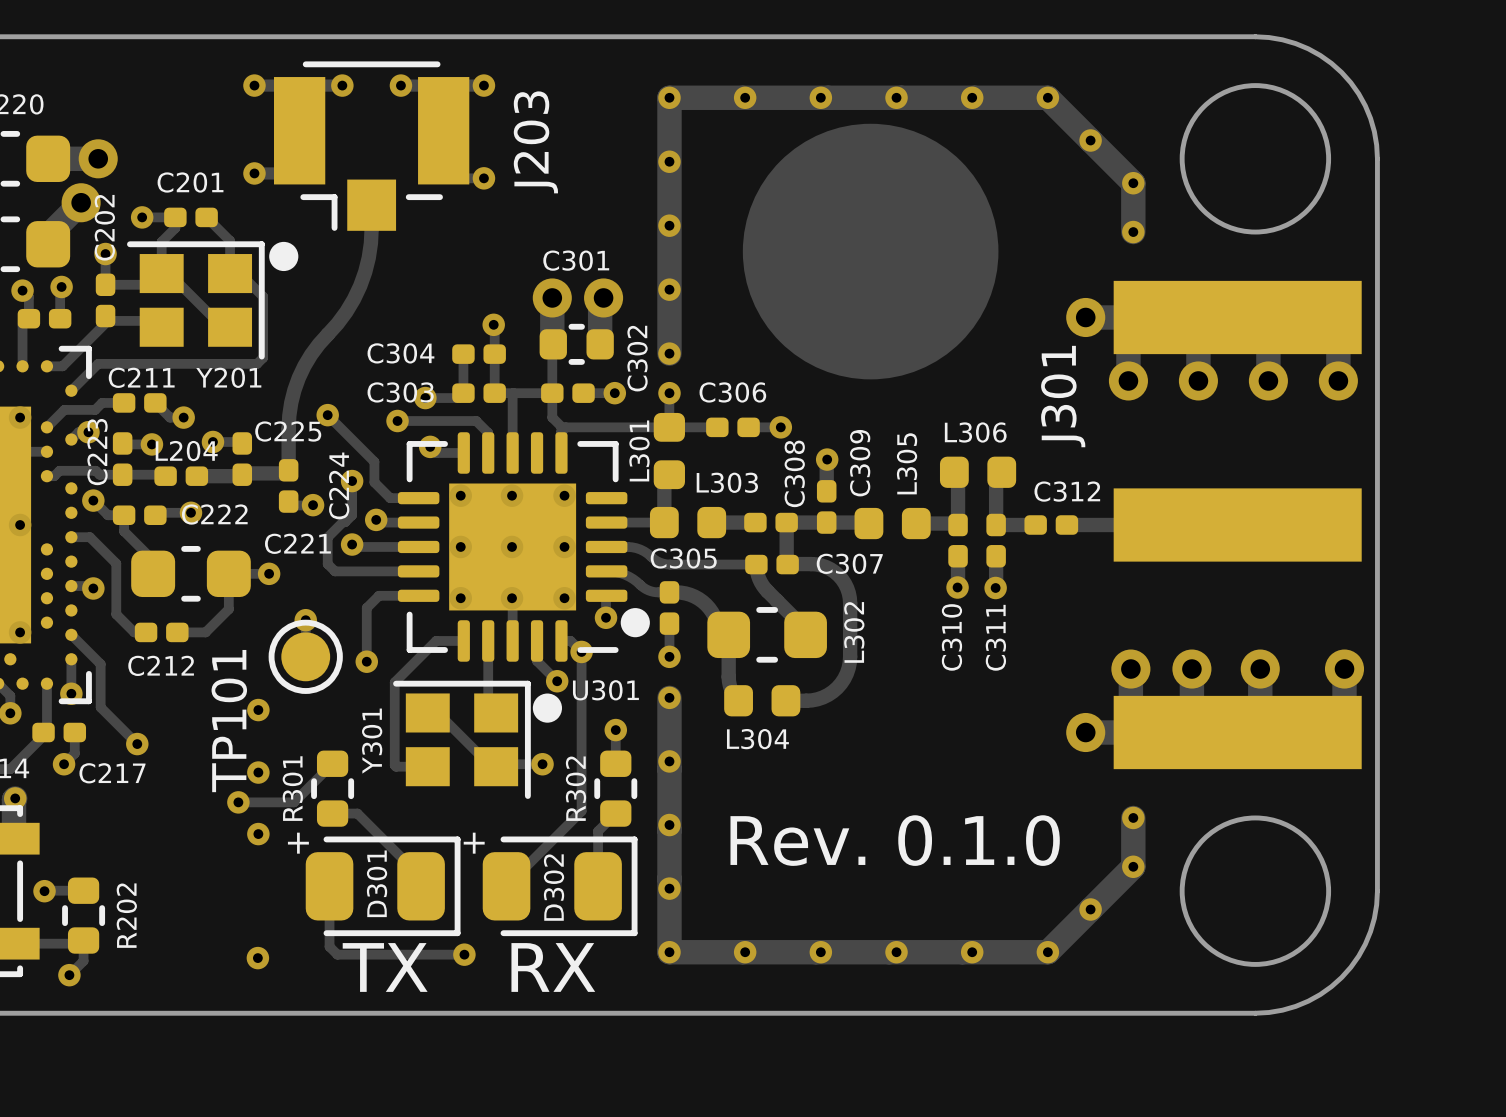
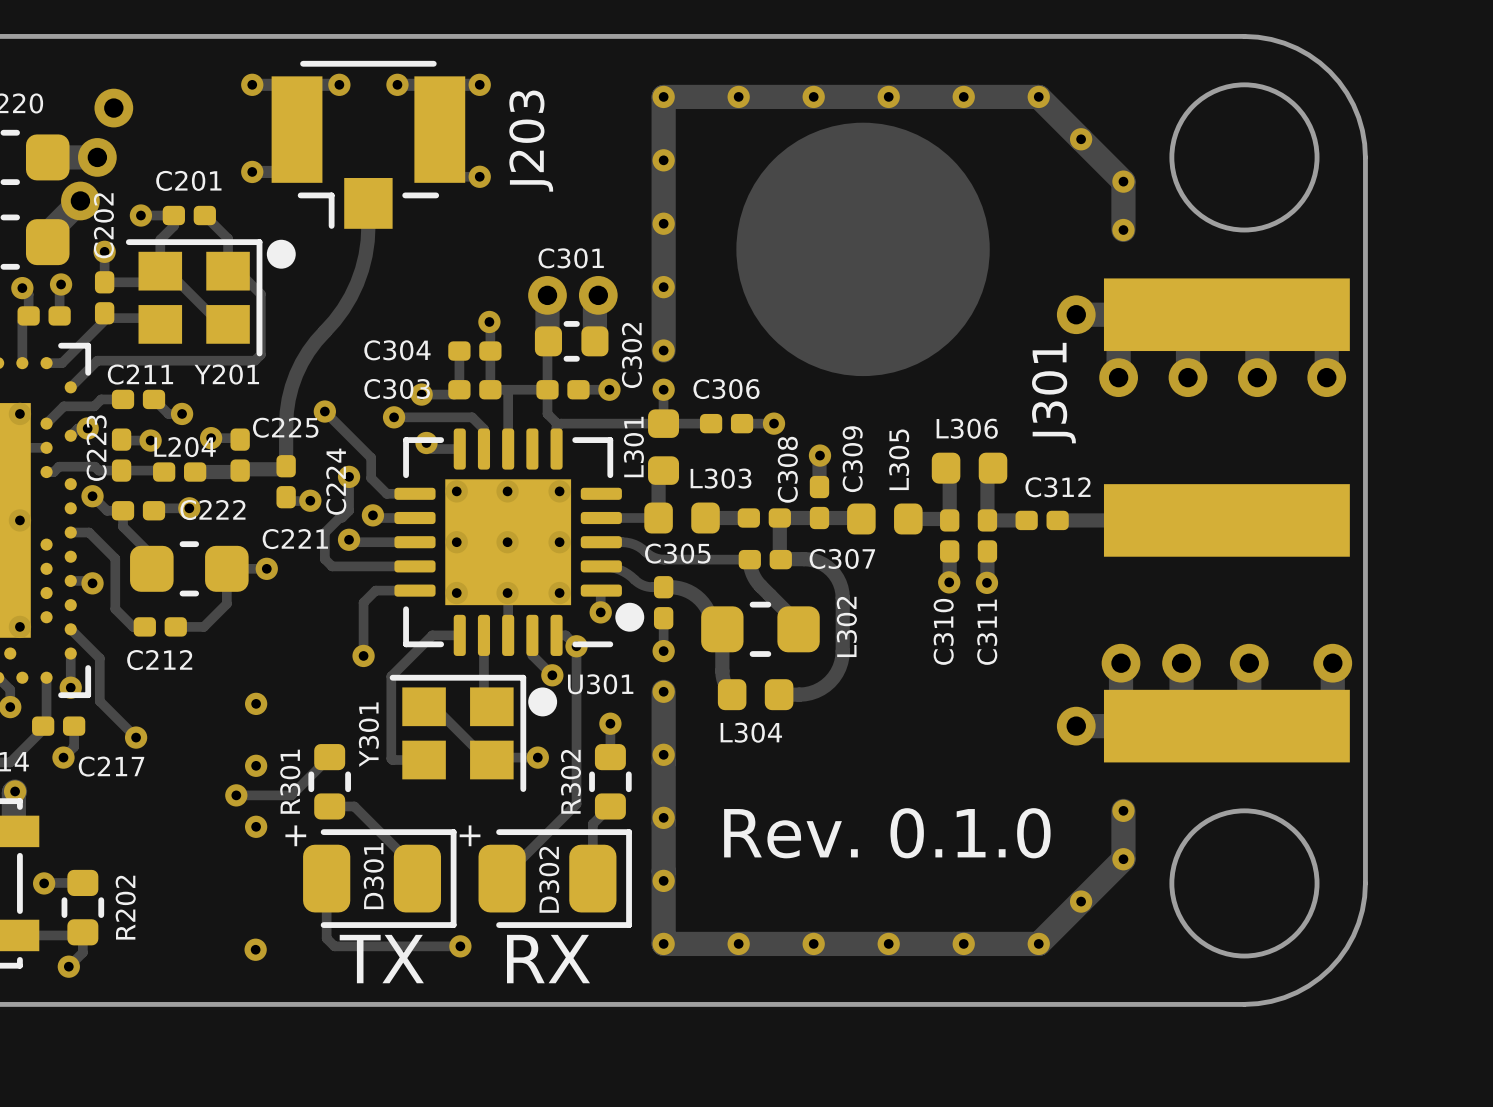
via: none -> (113, 108)
via: (305, 620) -> none
TP101: (305, 656) -> none

